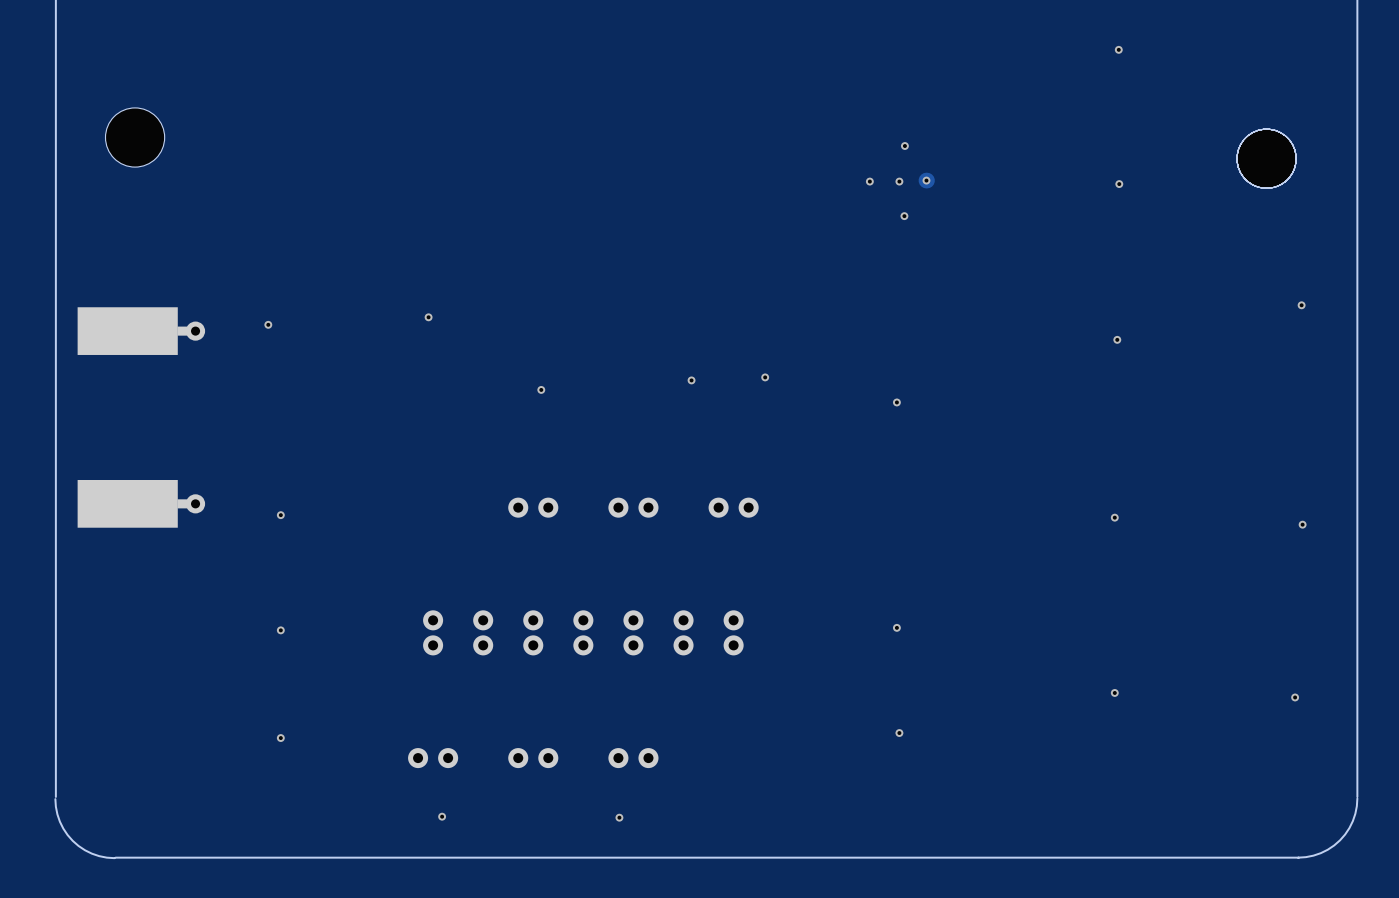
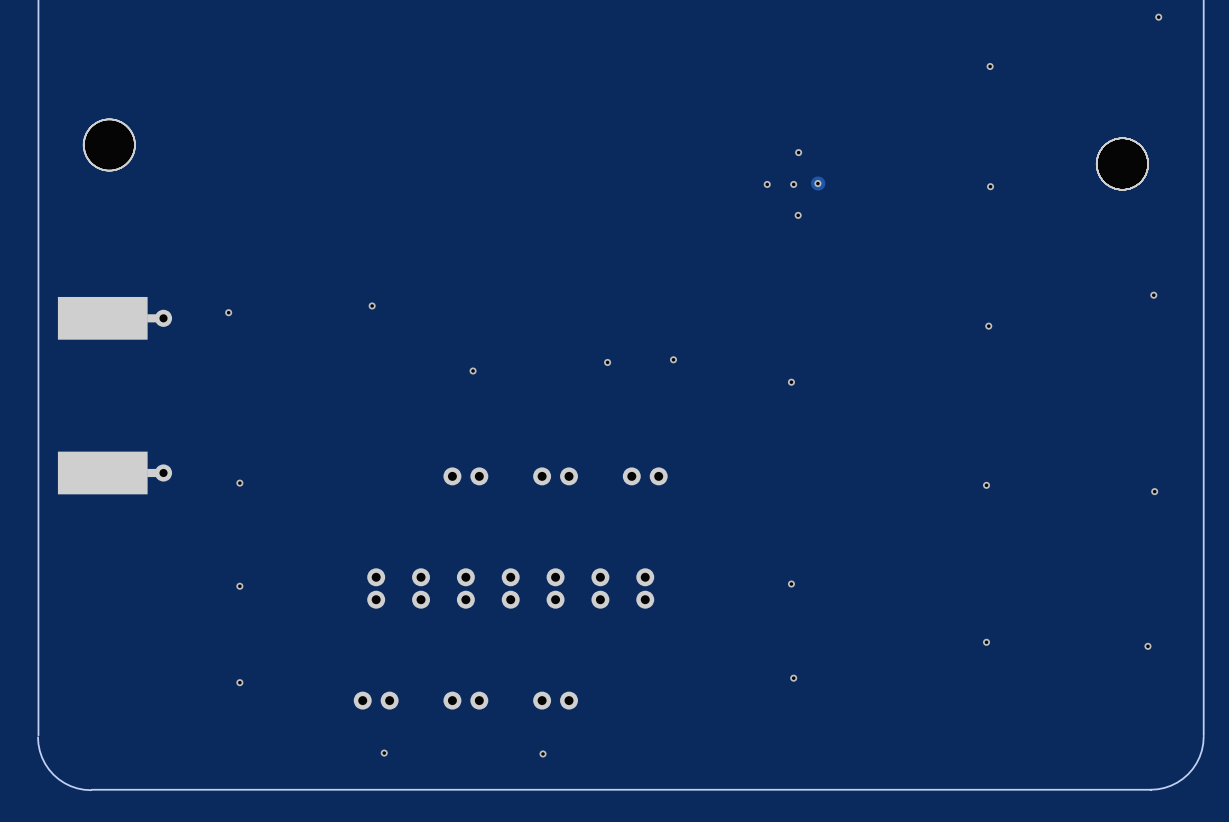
part footprint: [105, 107, 165, 168] -> [82, 118, 136, 172]
part footprint: [1237, 129, 1297, 189] -> [1095, 137, 1149, 191]

